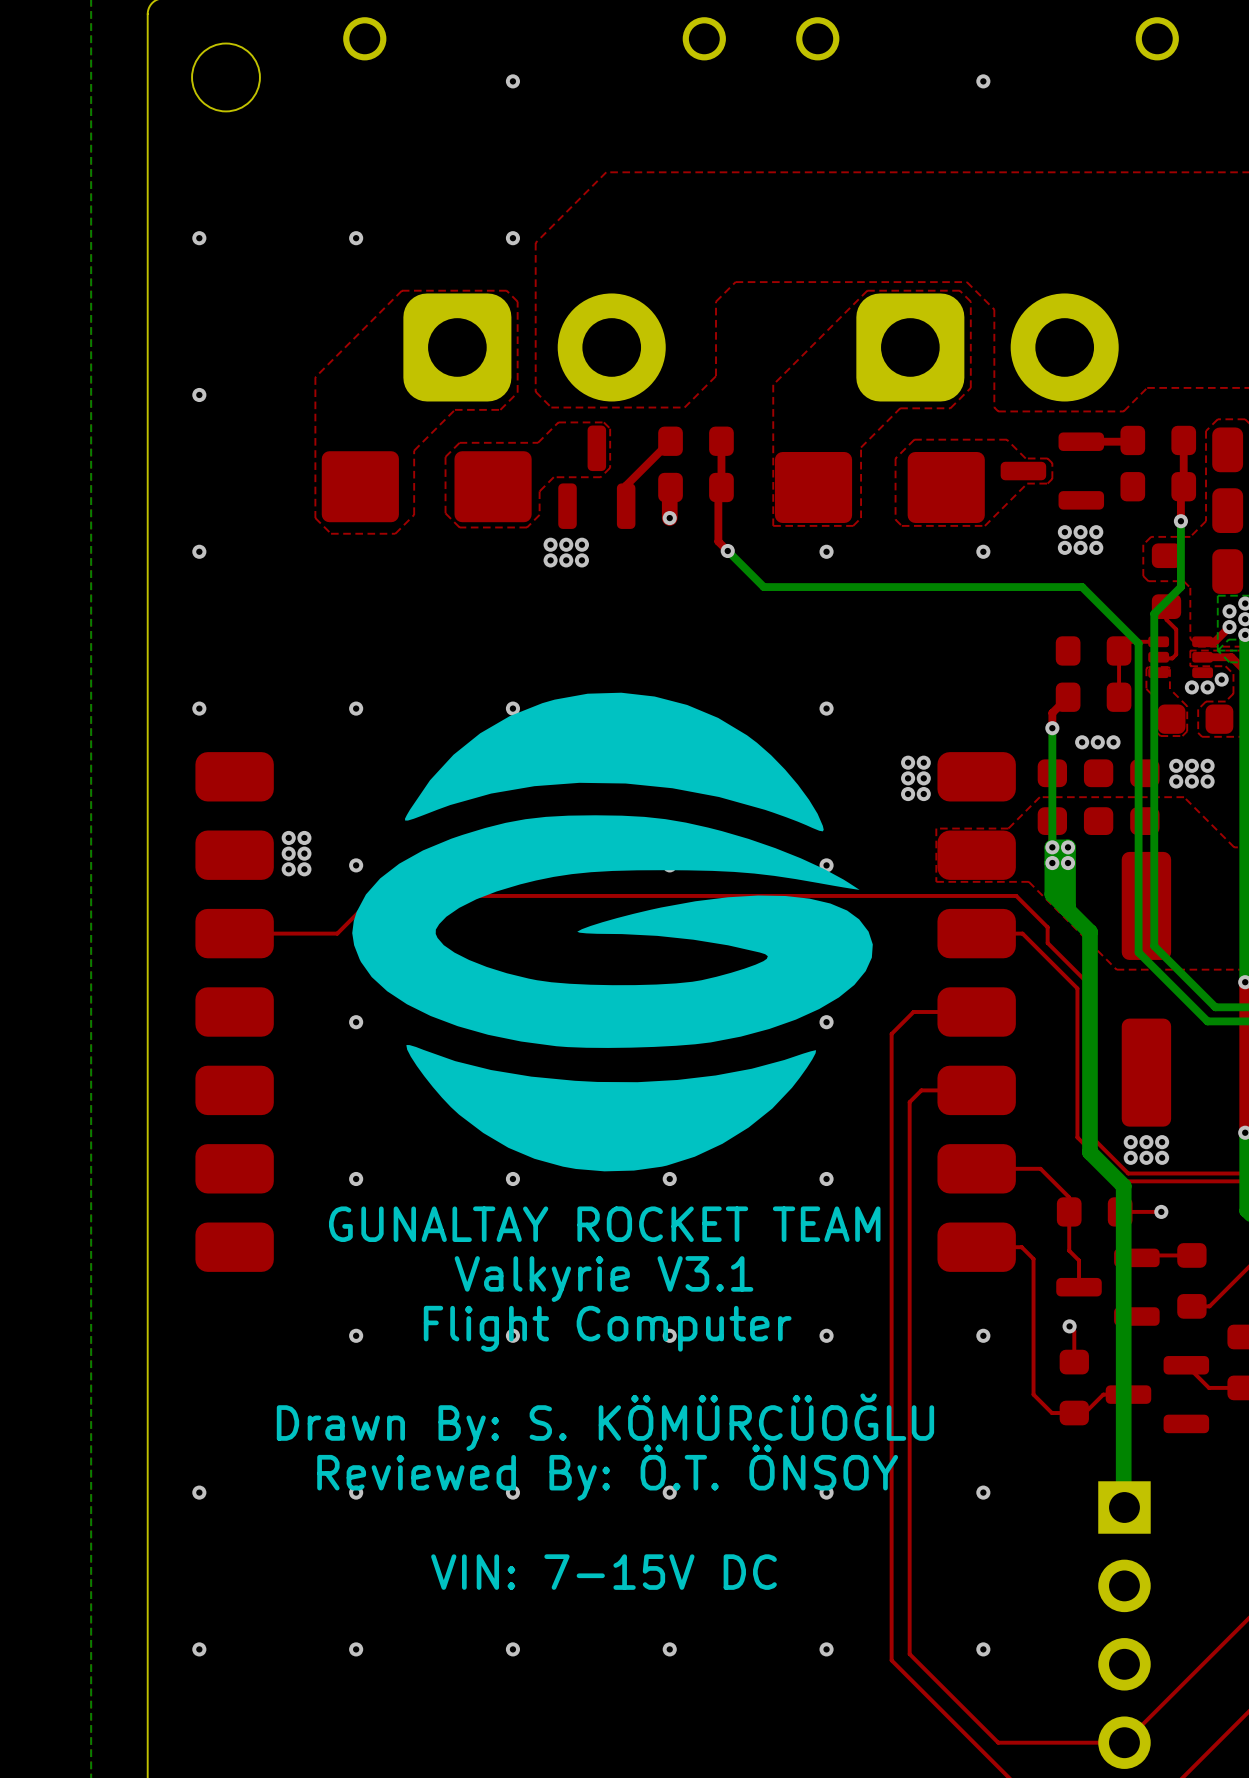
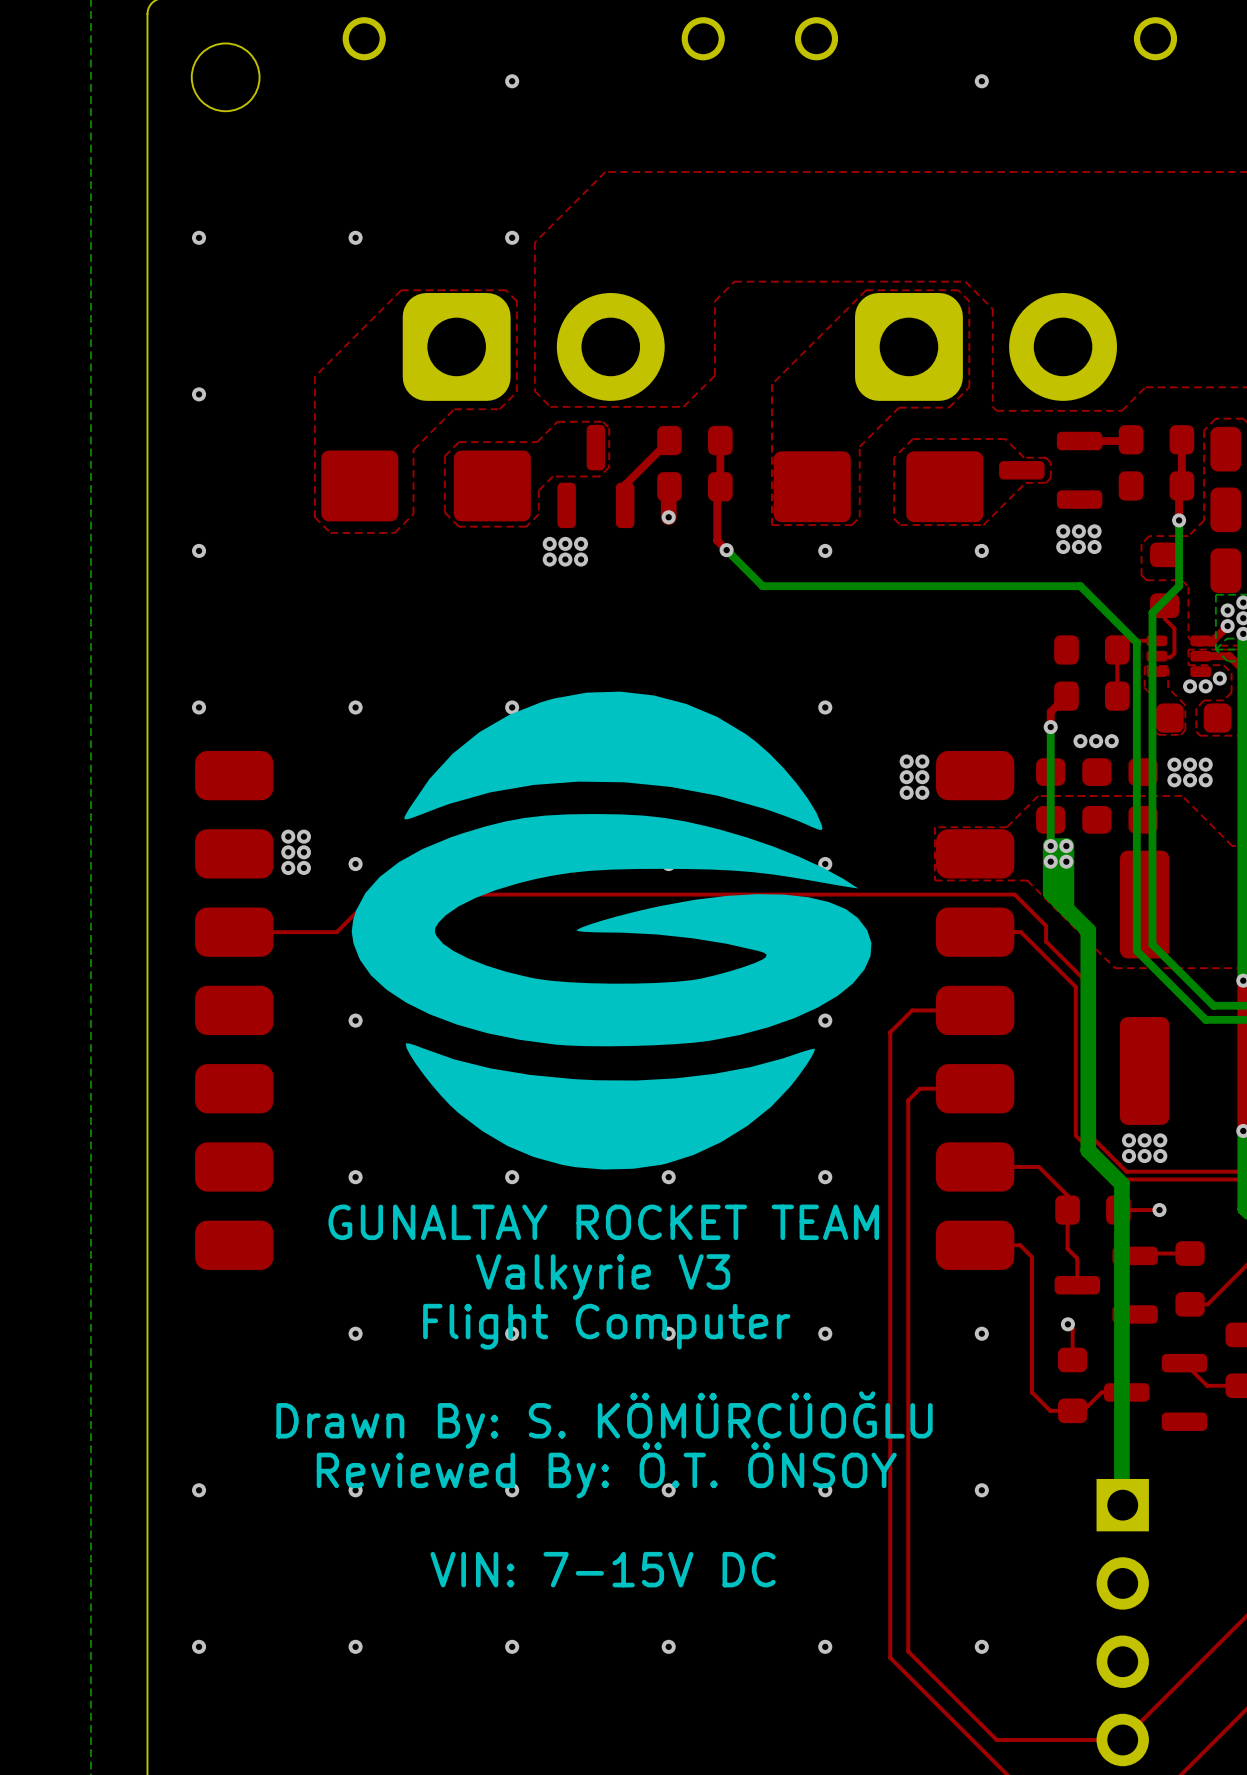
text: Valkyrie V3.1 (603, 1279) -> Valkyrie V3 (603, 1277)

